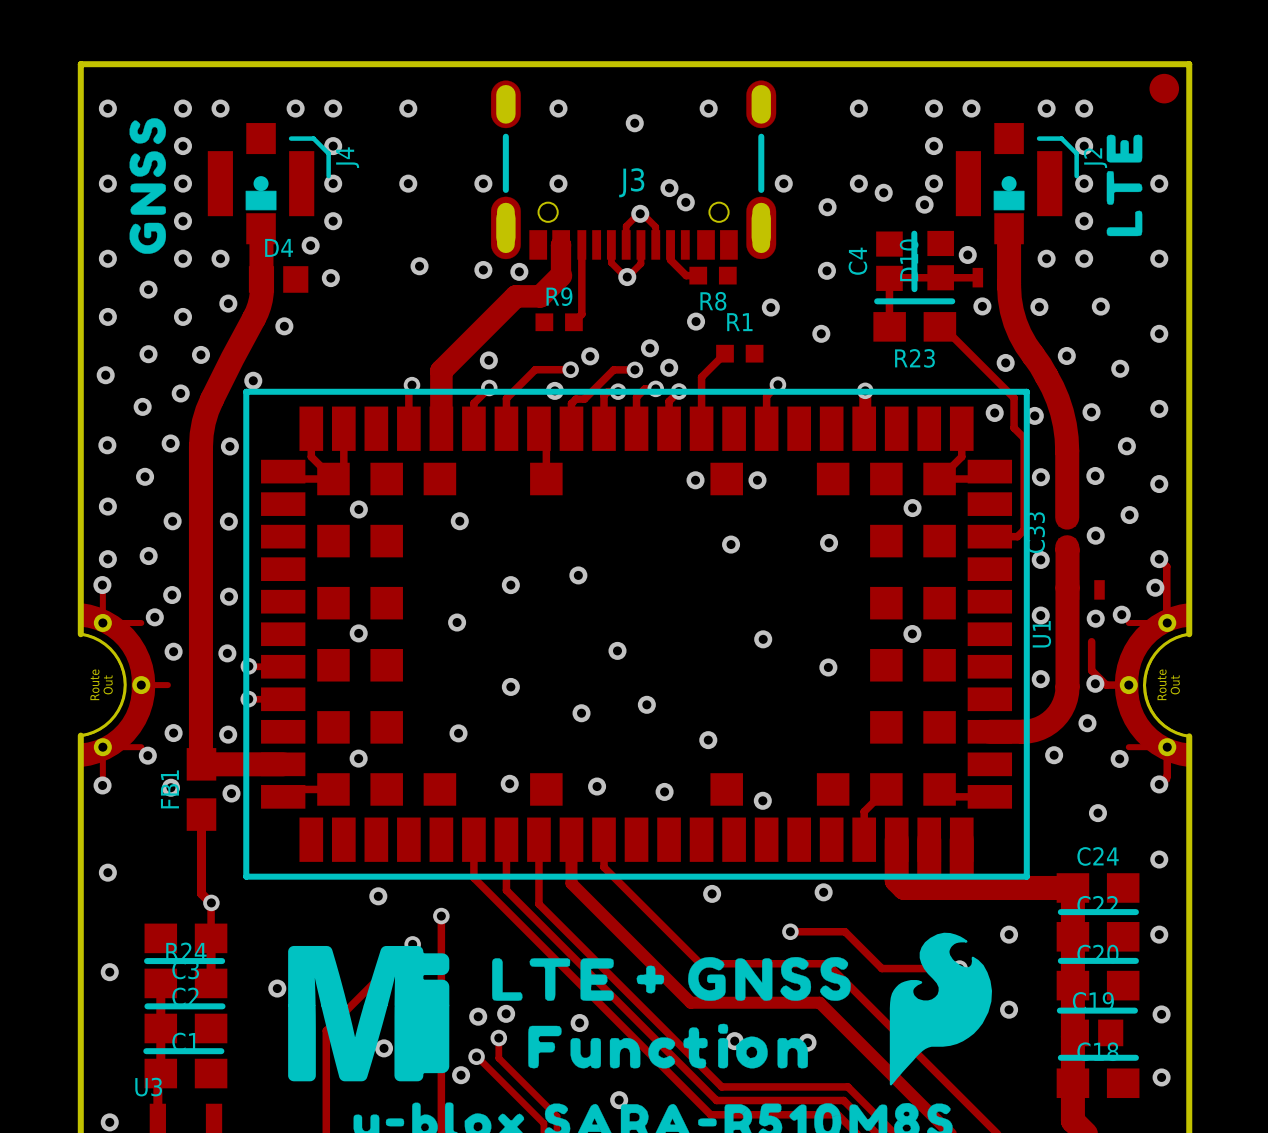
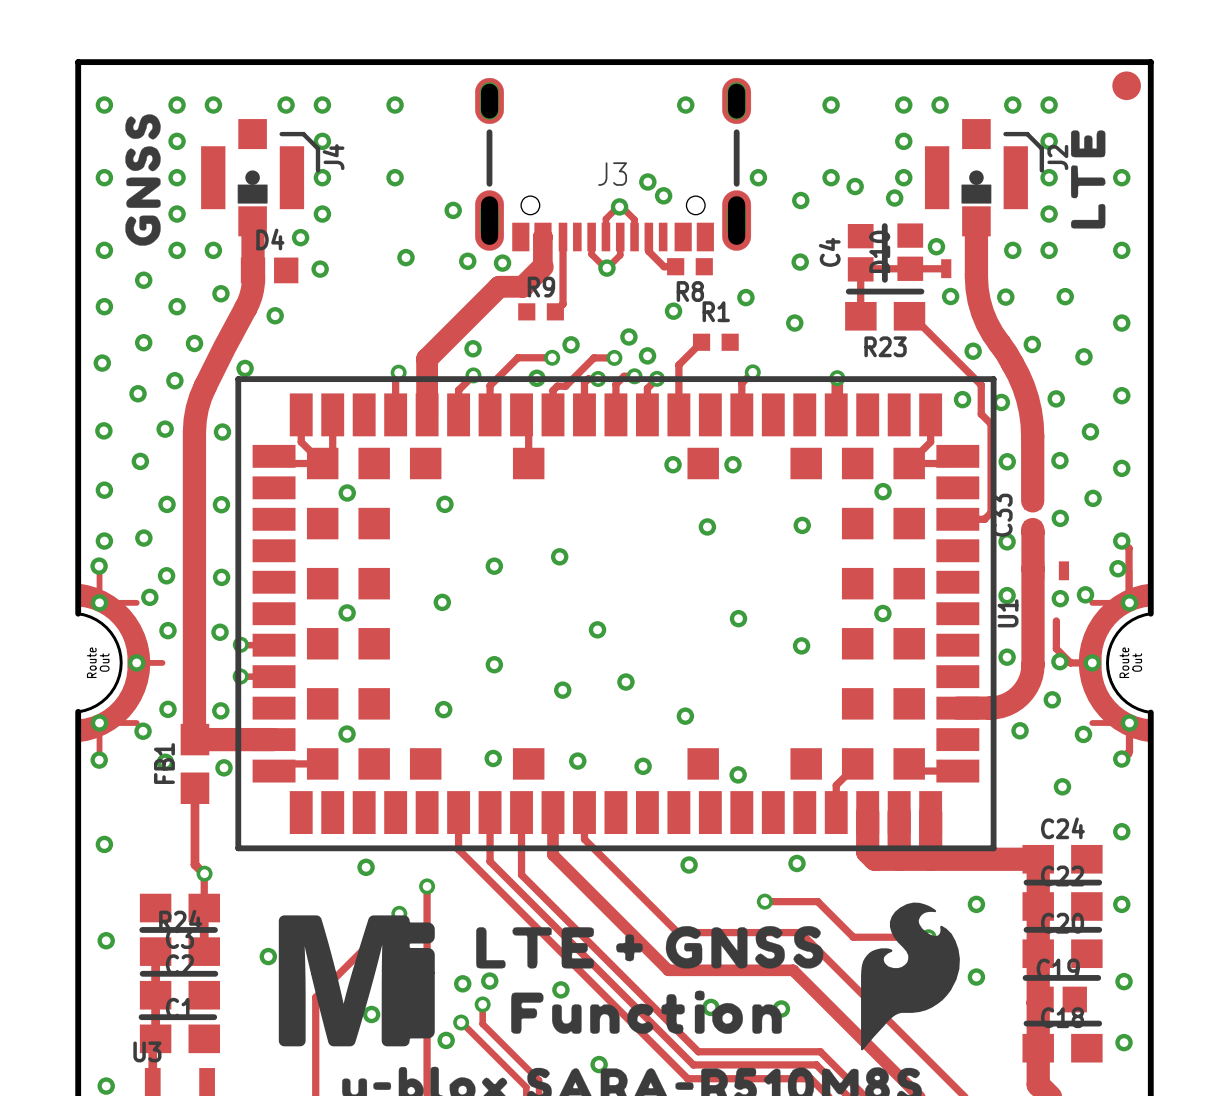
via: (558, 108) -> none
via: (634, 123) -> none
via position: (483, 183) -> (453, 210)
via: (558, 183) -> none

